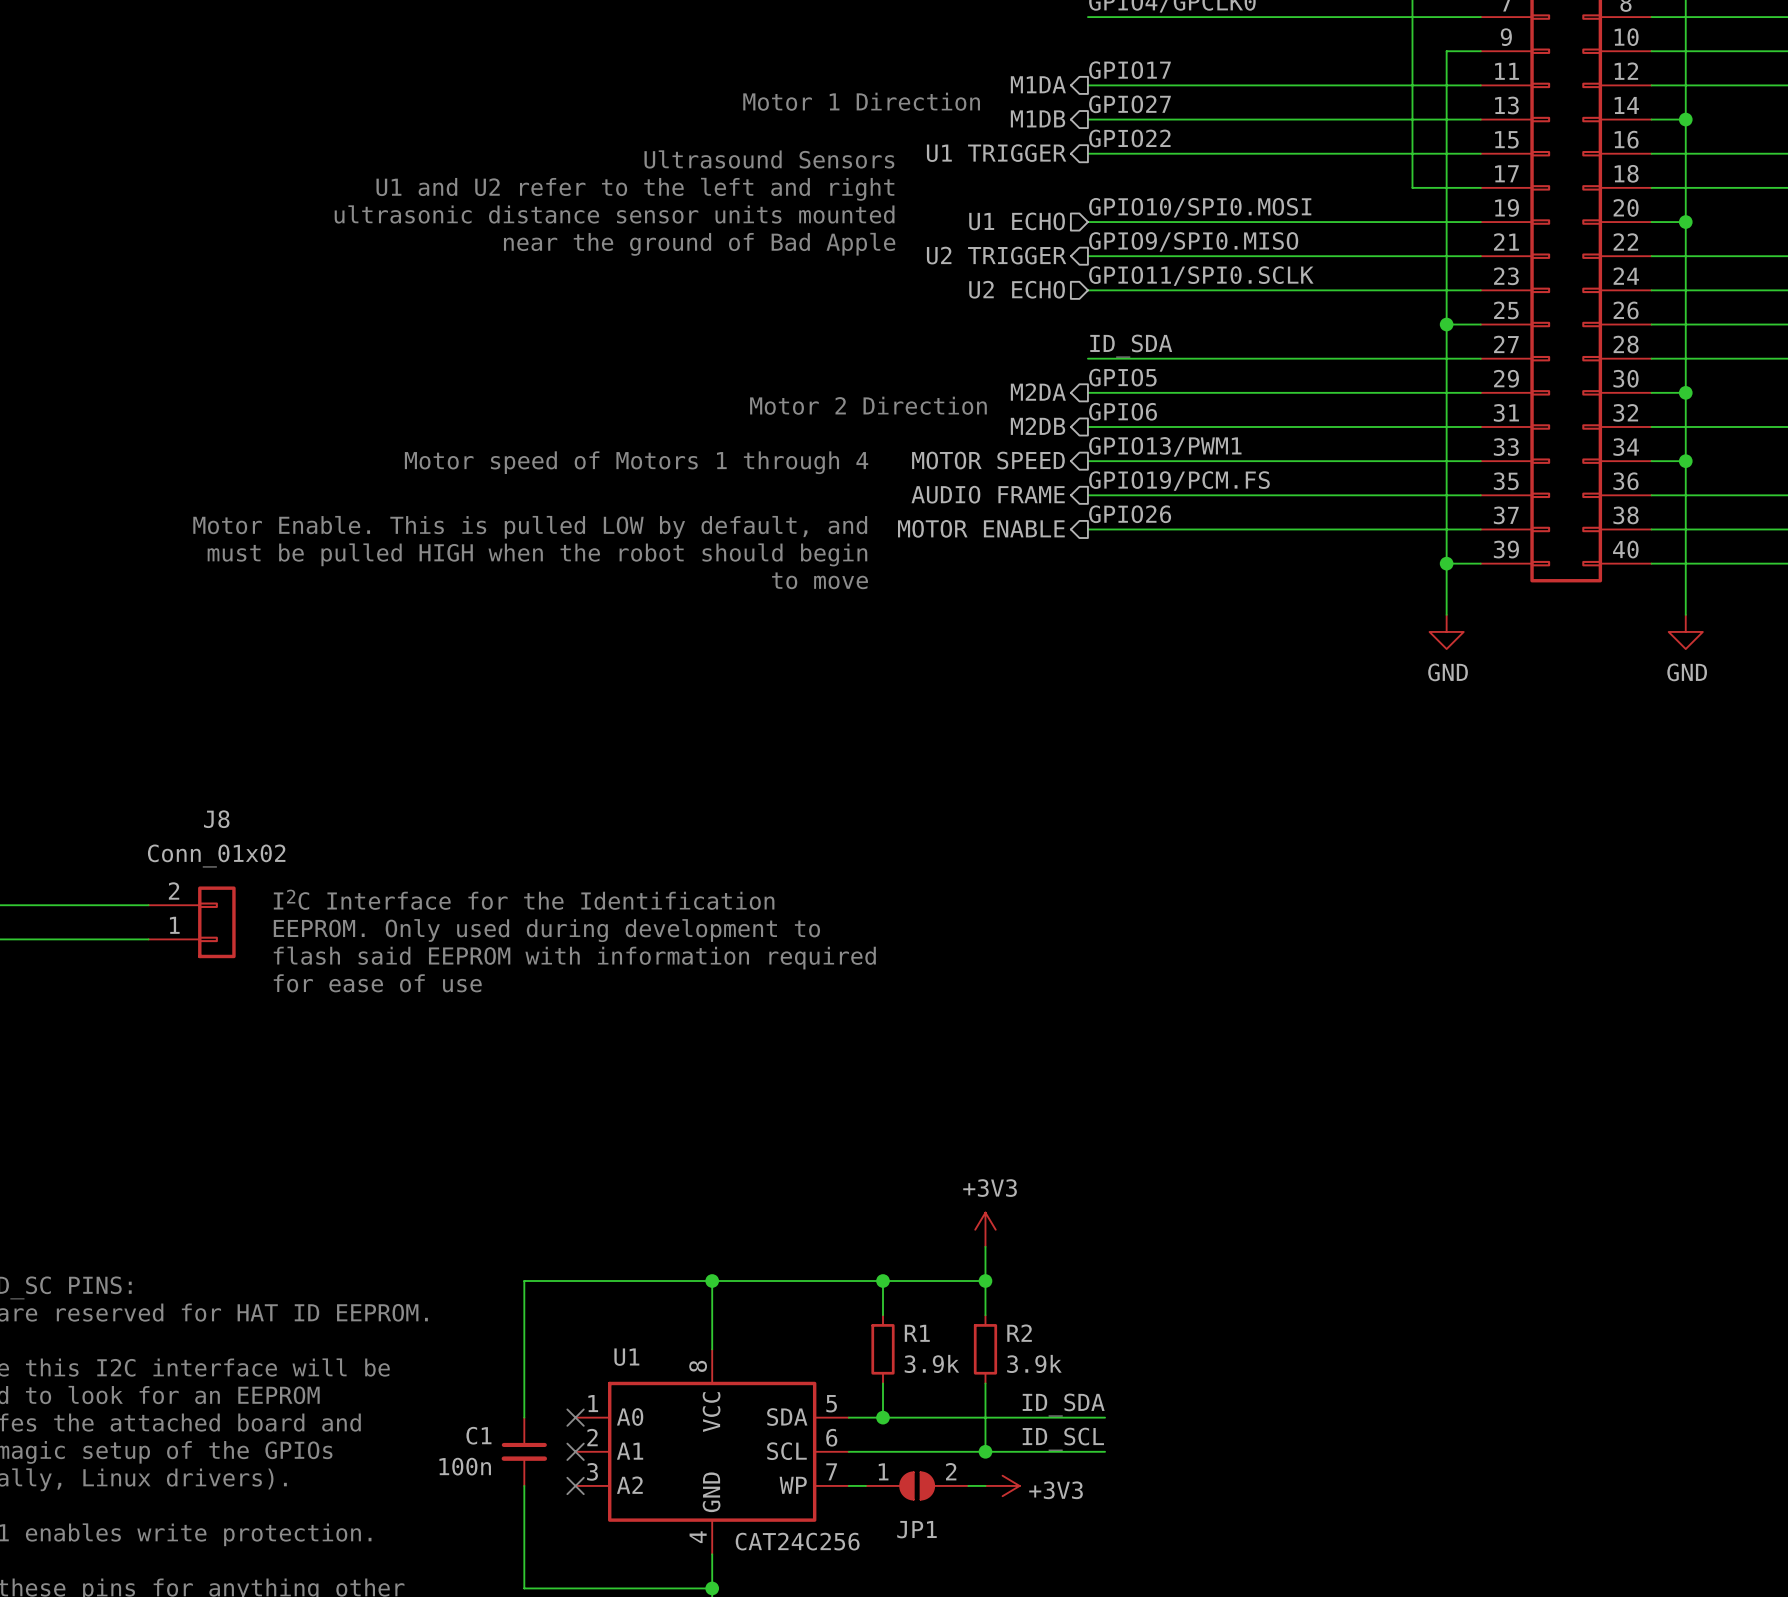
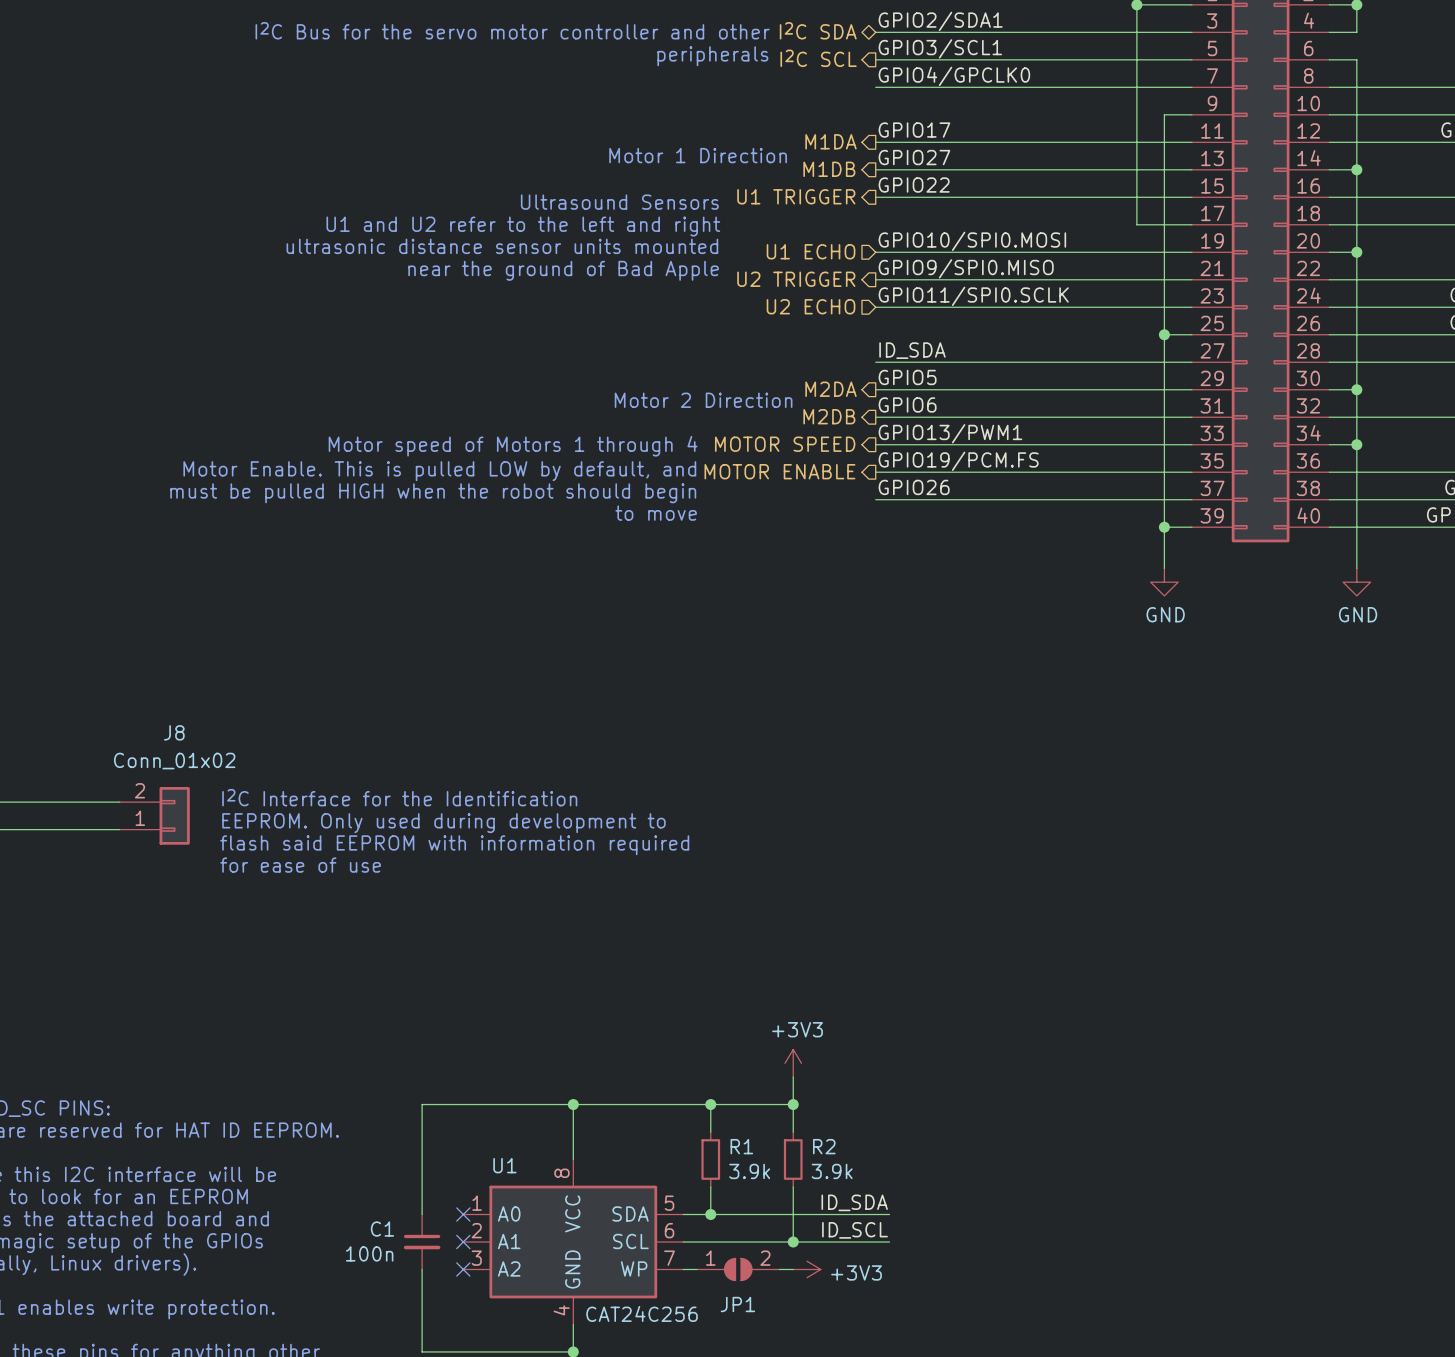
text: none -> Motor Enable. This is pulled LOW by default, and (439, 471)
hierarchical label: AUDIO FRAME (988, 494) -> MOTOR ENABLE (779, 471)
text: Motor Enable. This is pulled LOW by default, and (530, 527) -> must be pulled HIGH when the robot should begin (433, 493)
hierarchical label: MOTOR ENABLE (981, 528) -> none
text: must be pulled HIGH when the robot should begin (537, 554) -> to move (656, 513)
text: to move (820, 580) -> none

